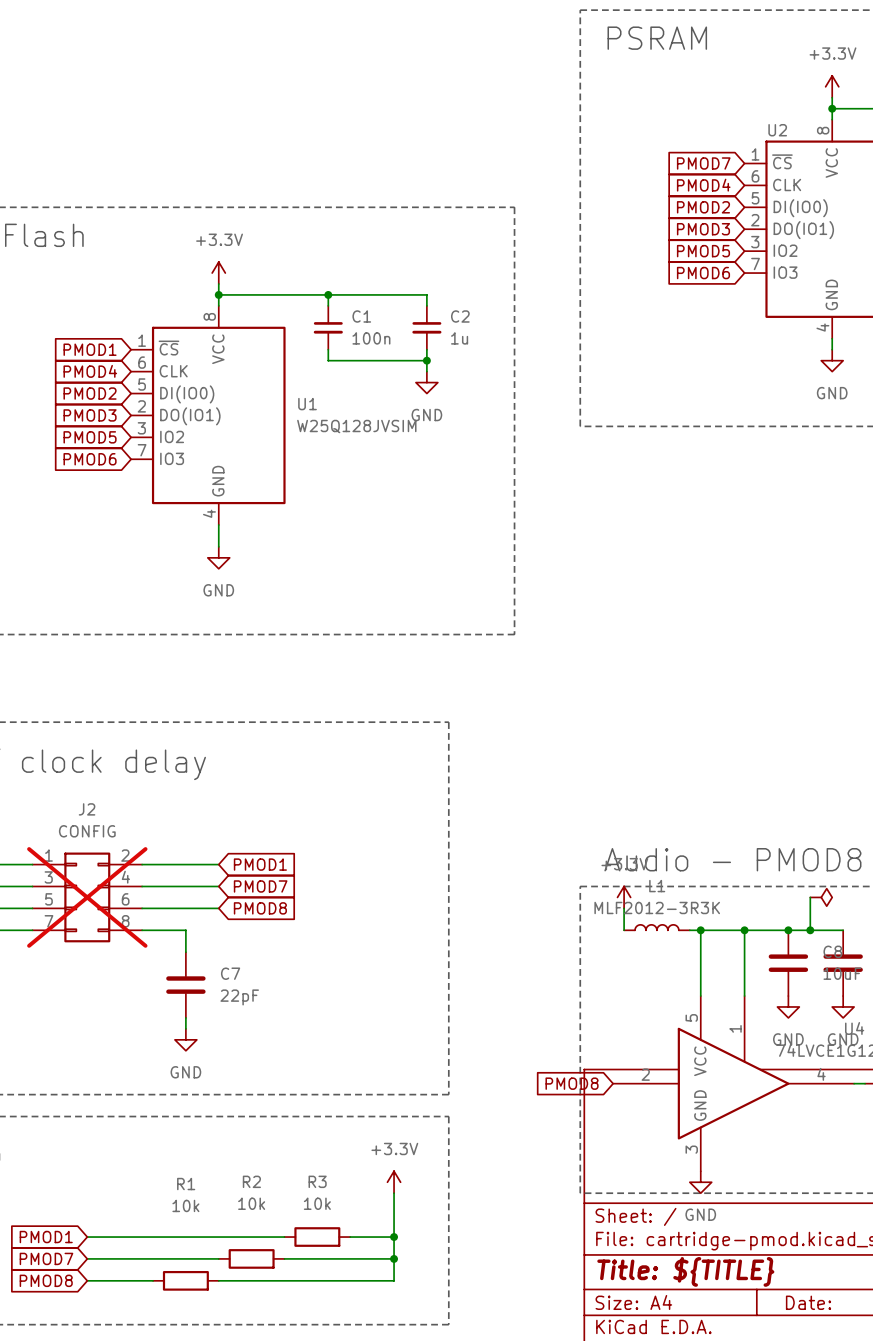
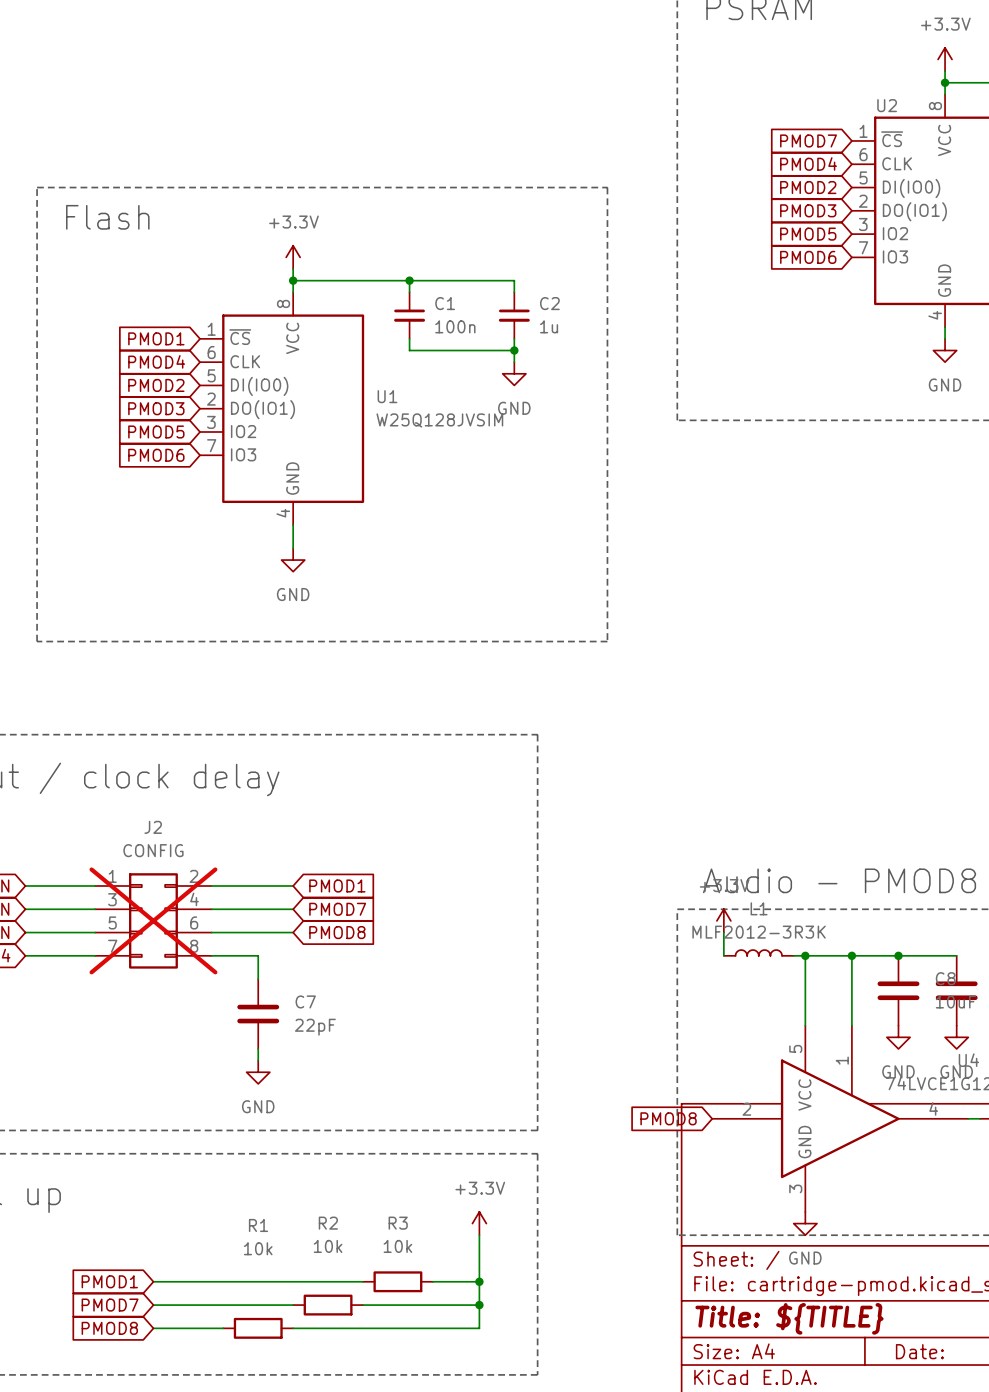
wire: (810, 897) (810, 930) -> none
power symbol: (821, 897) -> none
junction: (810, 930) -> none

